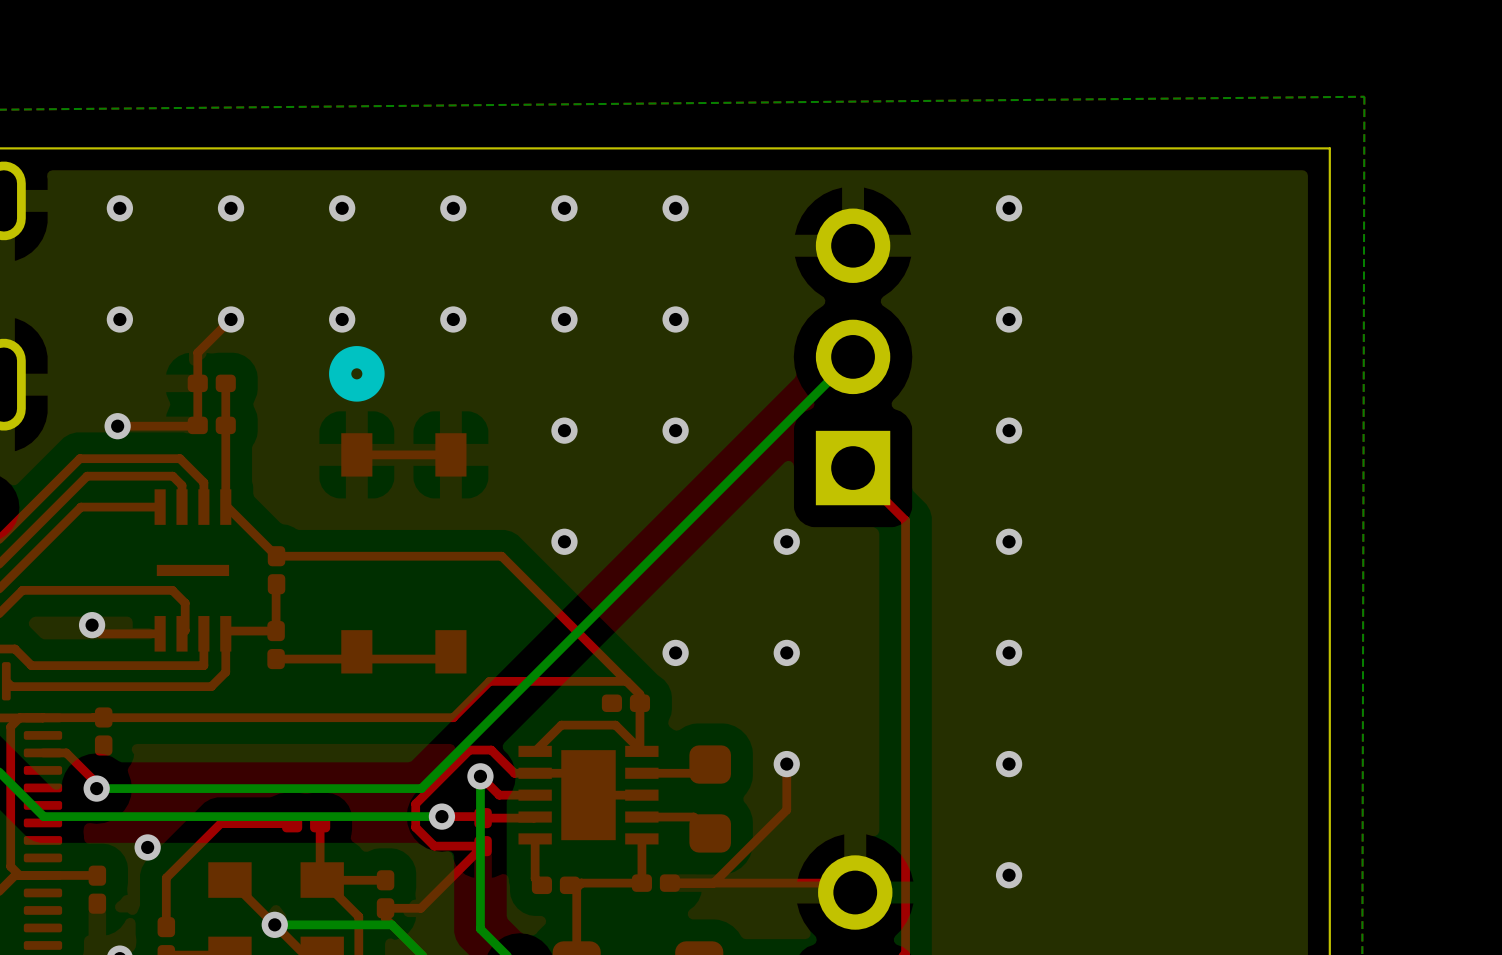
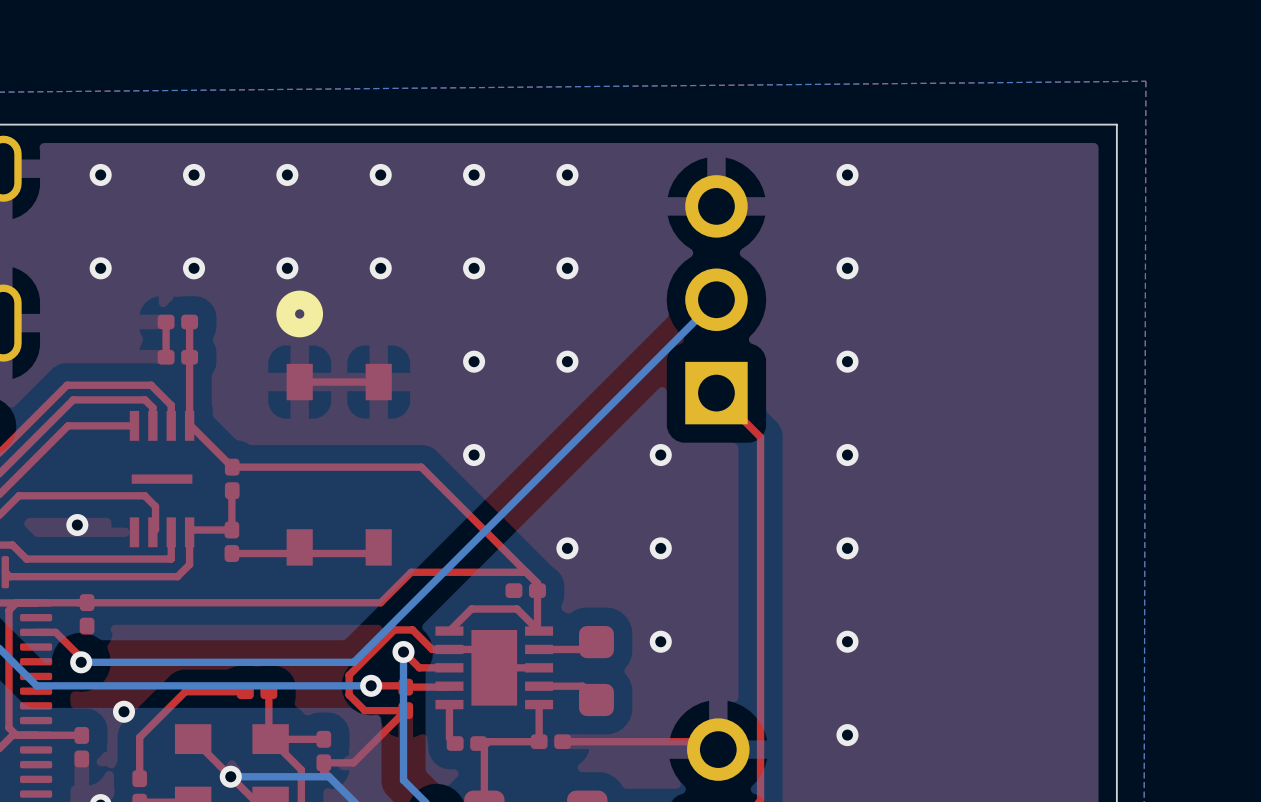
top track: (231, 319) (197, 352) (197, 383) -> none
top track: (197, 425) (117, 426) -> none
via: (117, 426) -> none
top track: (92, 625) (100, 633) (160, 633) -> none
top track: (786, 764) (786, 810) (713, 883) -> none

